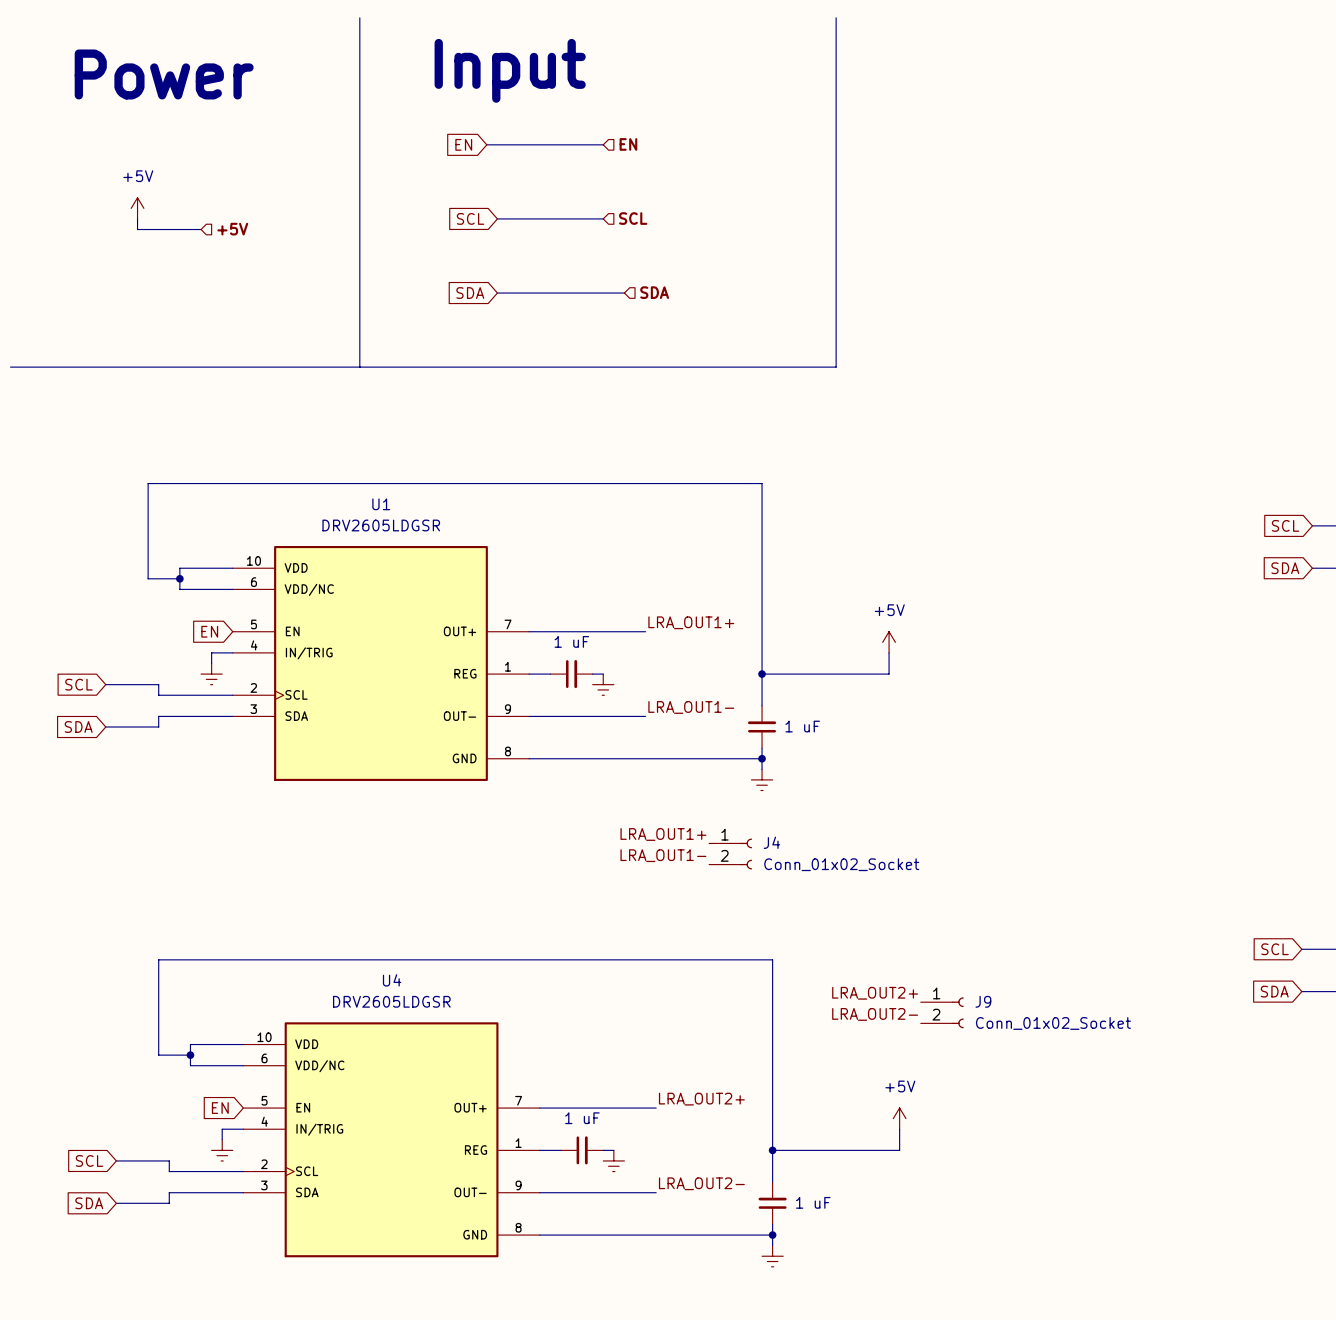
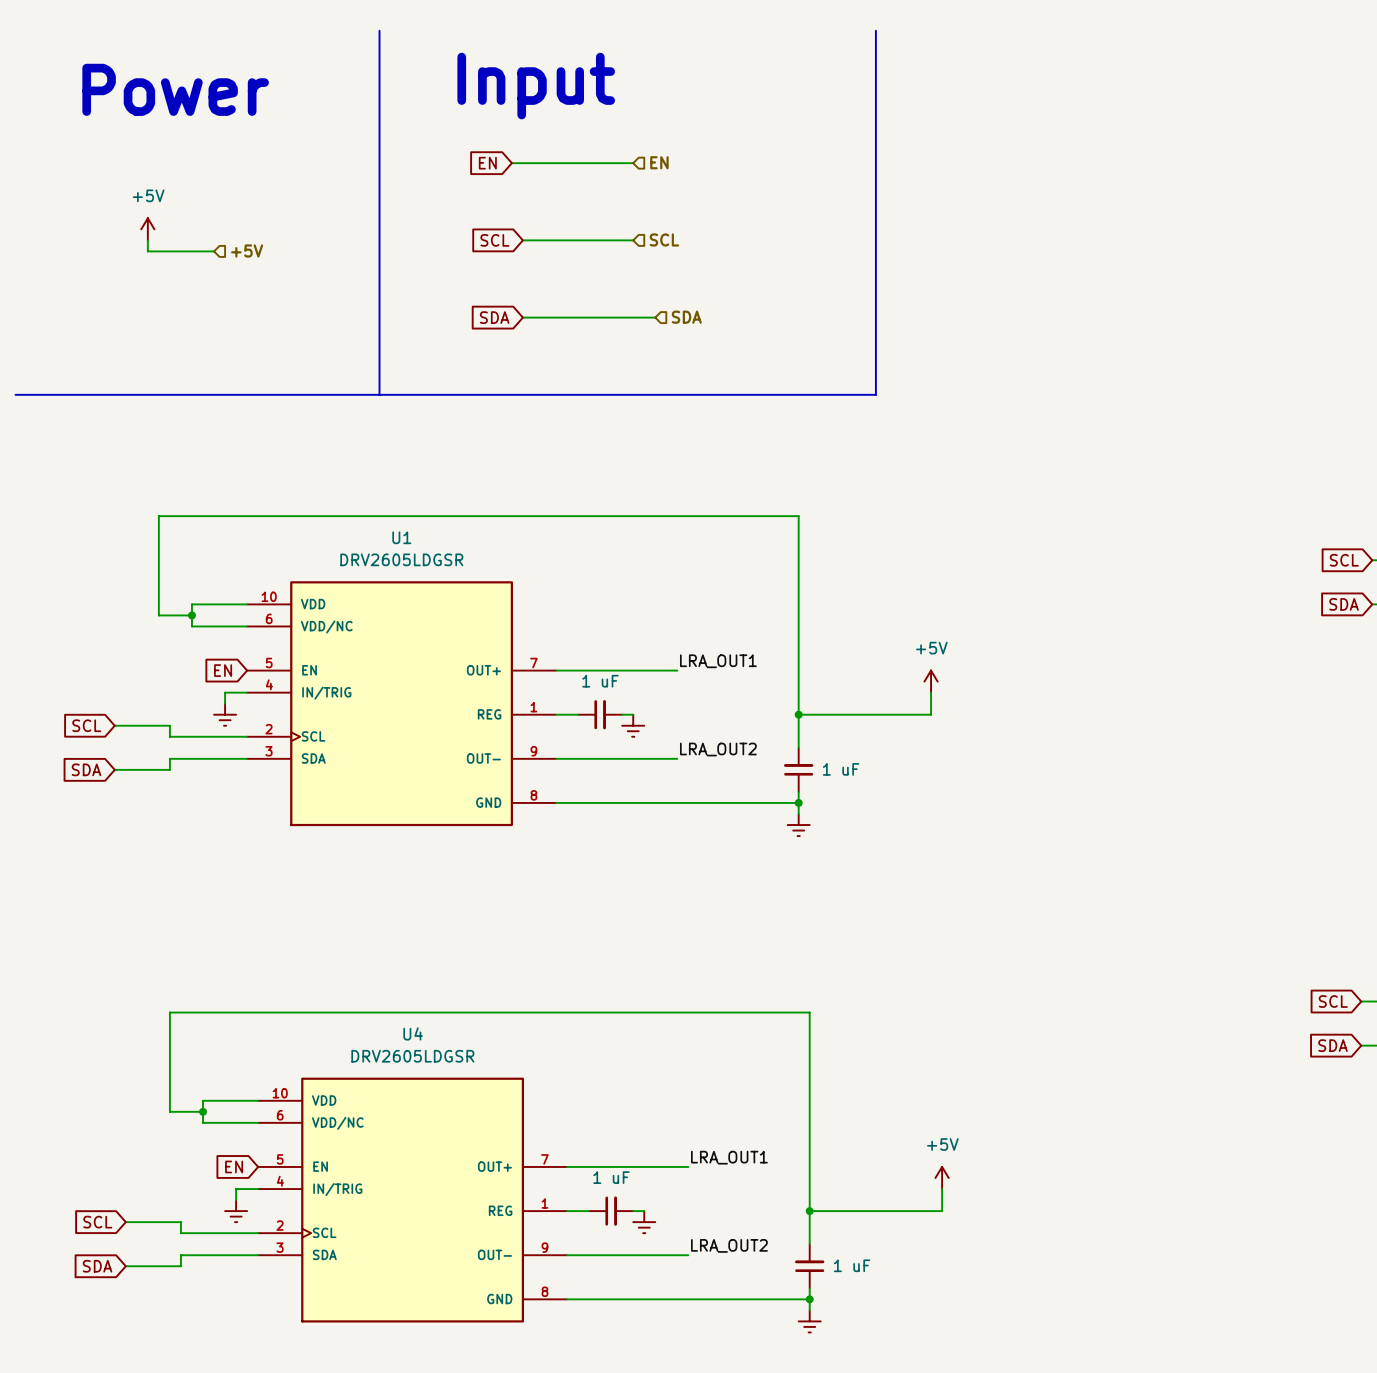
label: LRA_OUT1+ (691, 622) -> LRA_OUT1 (718, 661)
label: LRA_OUT1- (691, 707) -> LRA_OUT2 (718, 749)
label: LRA_OUT1+ (663, 834) -> none
J4: Conn_01x02_Socket (730, 854) -> none
label: LRA_OUT1- (663, 855) -> none
label: LRA_OUT2+ (875, 993) -> none
J9: Conn_01x02_Socket (942, 1012) -> none
label: LRA_OUT2- (875, 1014) -> none
label: LRA_OUT2+ (701, 1099) -> LRA_OUT1 (729, 1157)
label: LRA_OUT2- (701, 1183) -> LRA_OUT2 (729, 1245)

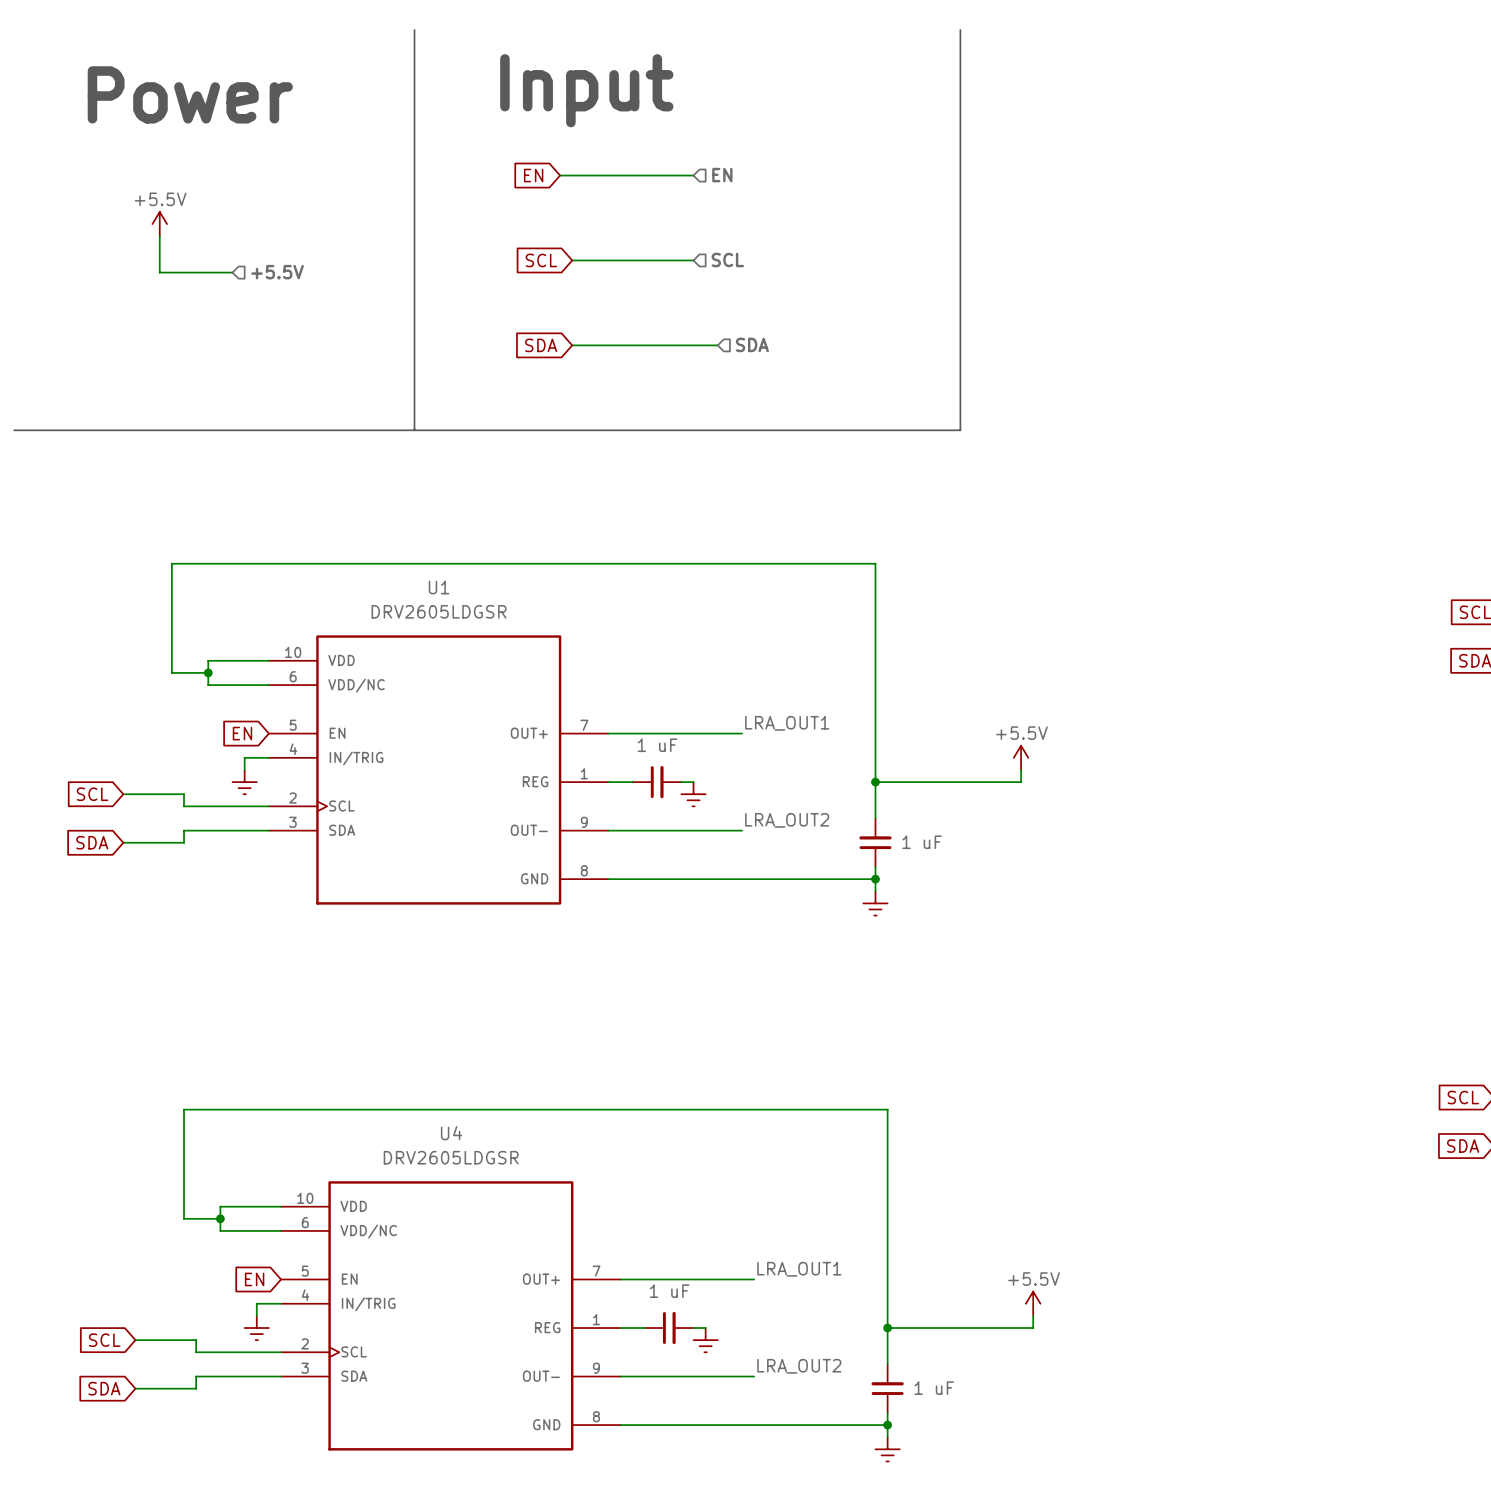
power symbol: none -> +5.5V (159, 224)
power symbol: +5V (147, 229) -> none
hierarchical label: +5V (247, 251) -> +5.5V (277, 272)
power symbol: +5V (931, 681) -> none
power symbol: none -> +5.5V (1021, 757)
power symbol: +5V (942, 1178) -> none
power symbol: none -> +5.5V (1033, 1303)

